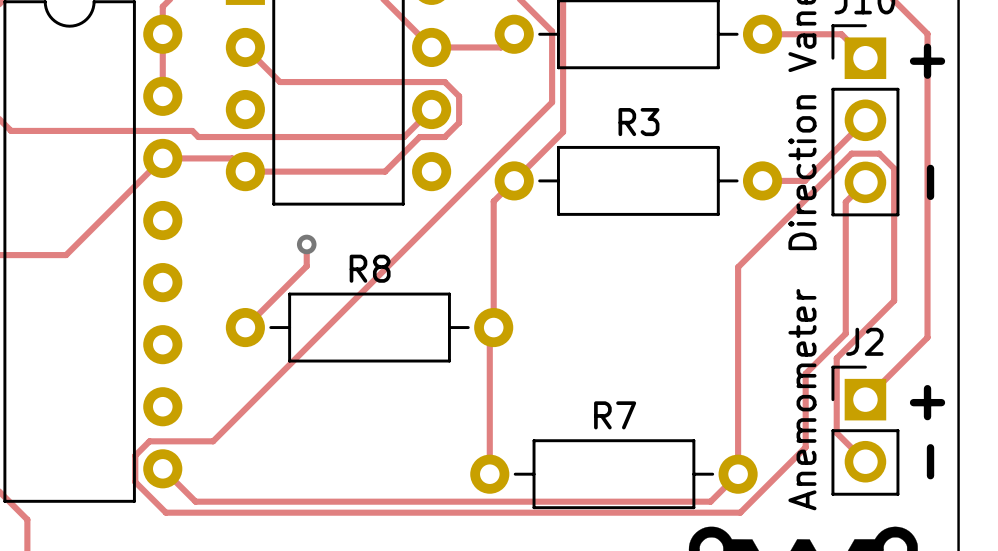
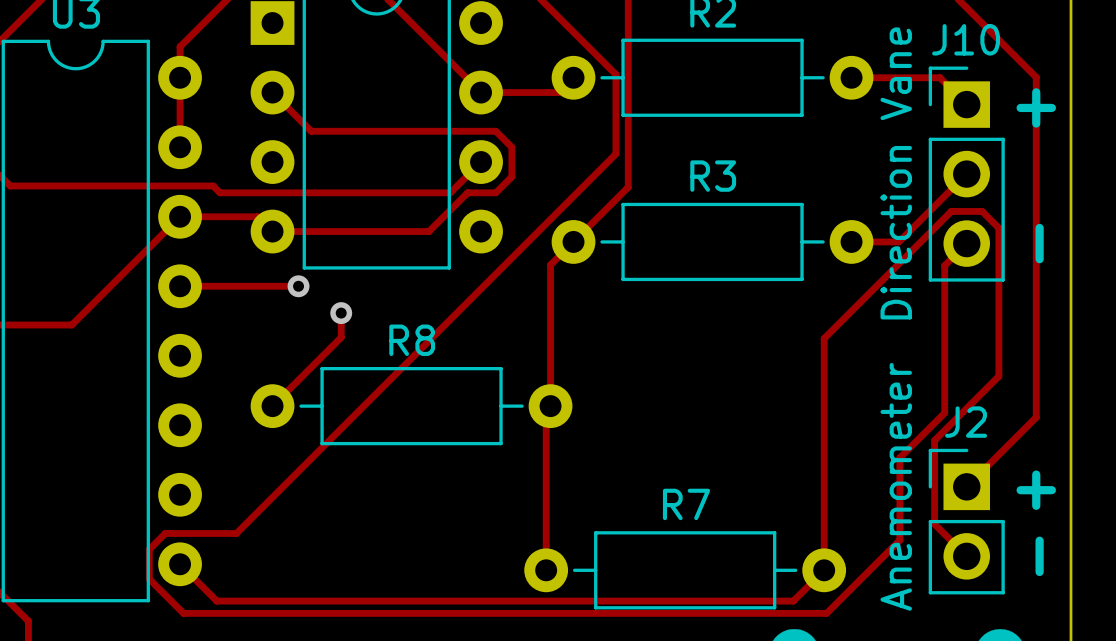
track: none -> (180, 286) (298, 286)
via: none -> (298, 286)

